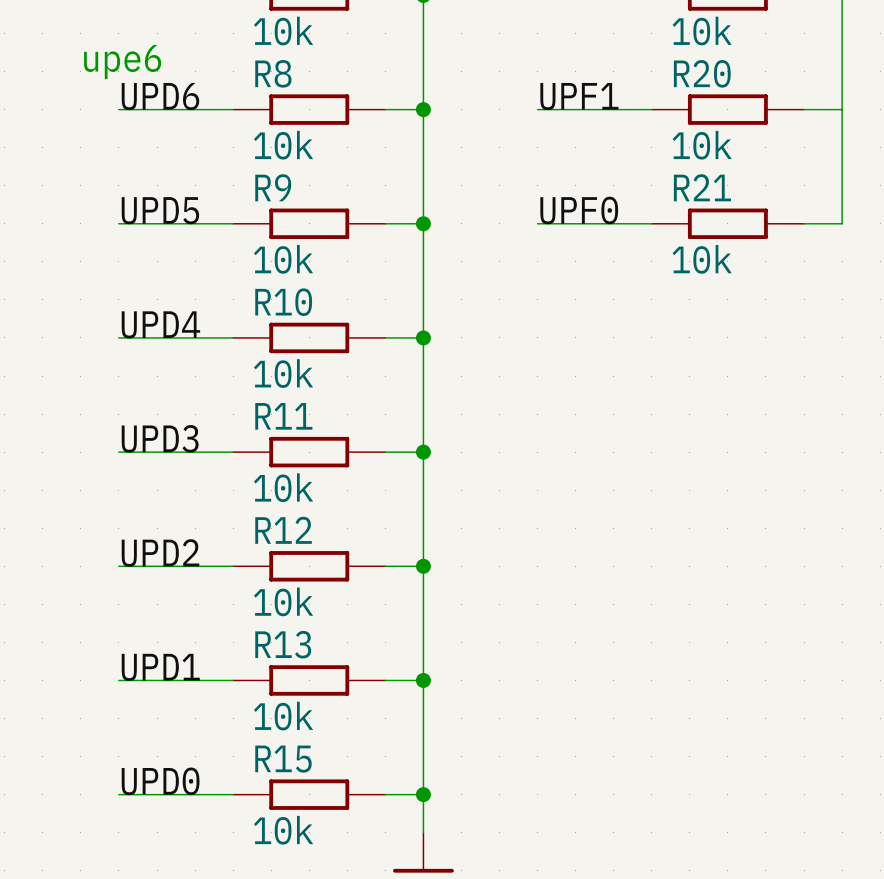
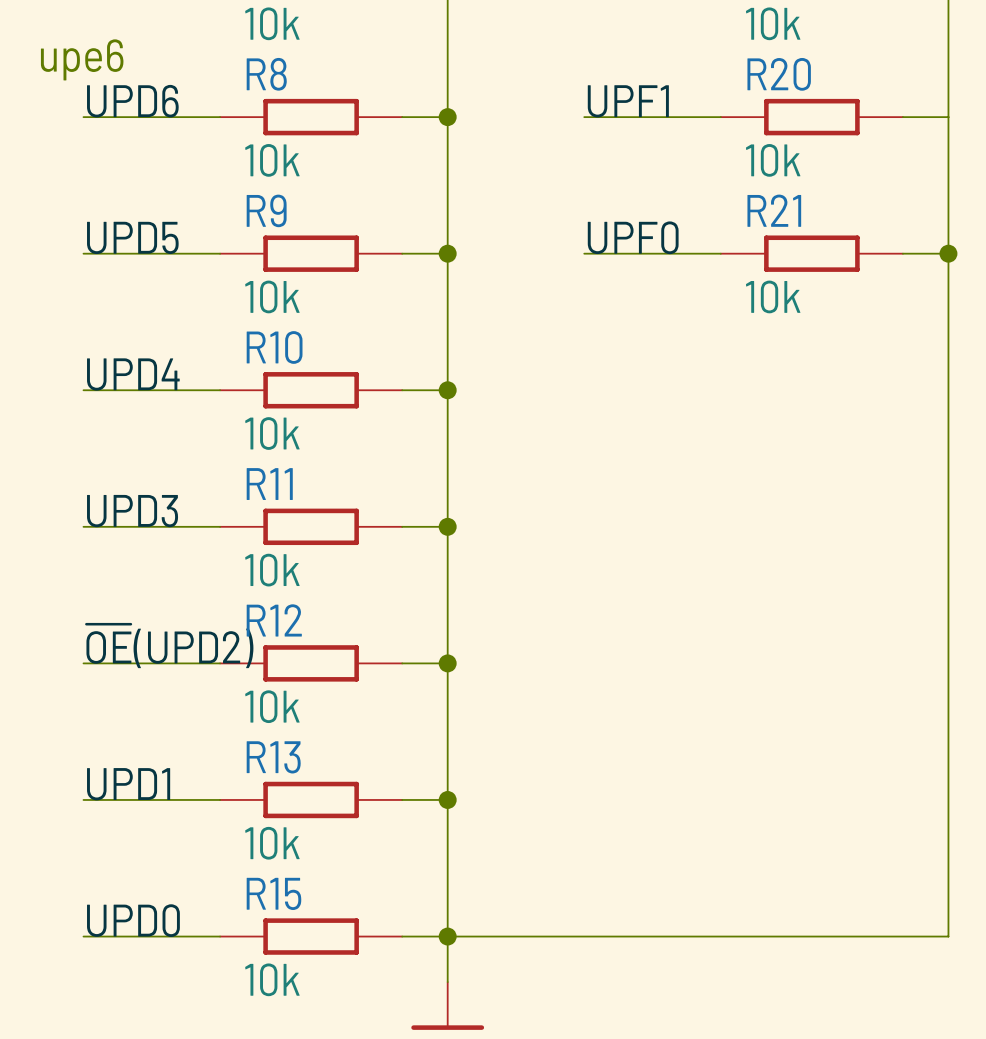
wire: none -> (948, 253) (948, 936) (447, 936)
junction: none -> (948, 253)
label: UPD2 (160, 552) -> ~{OE}(UPD2) (169, 646)

